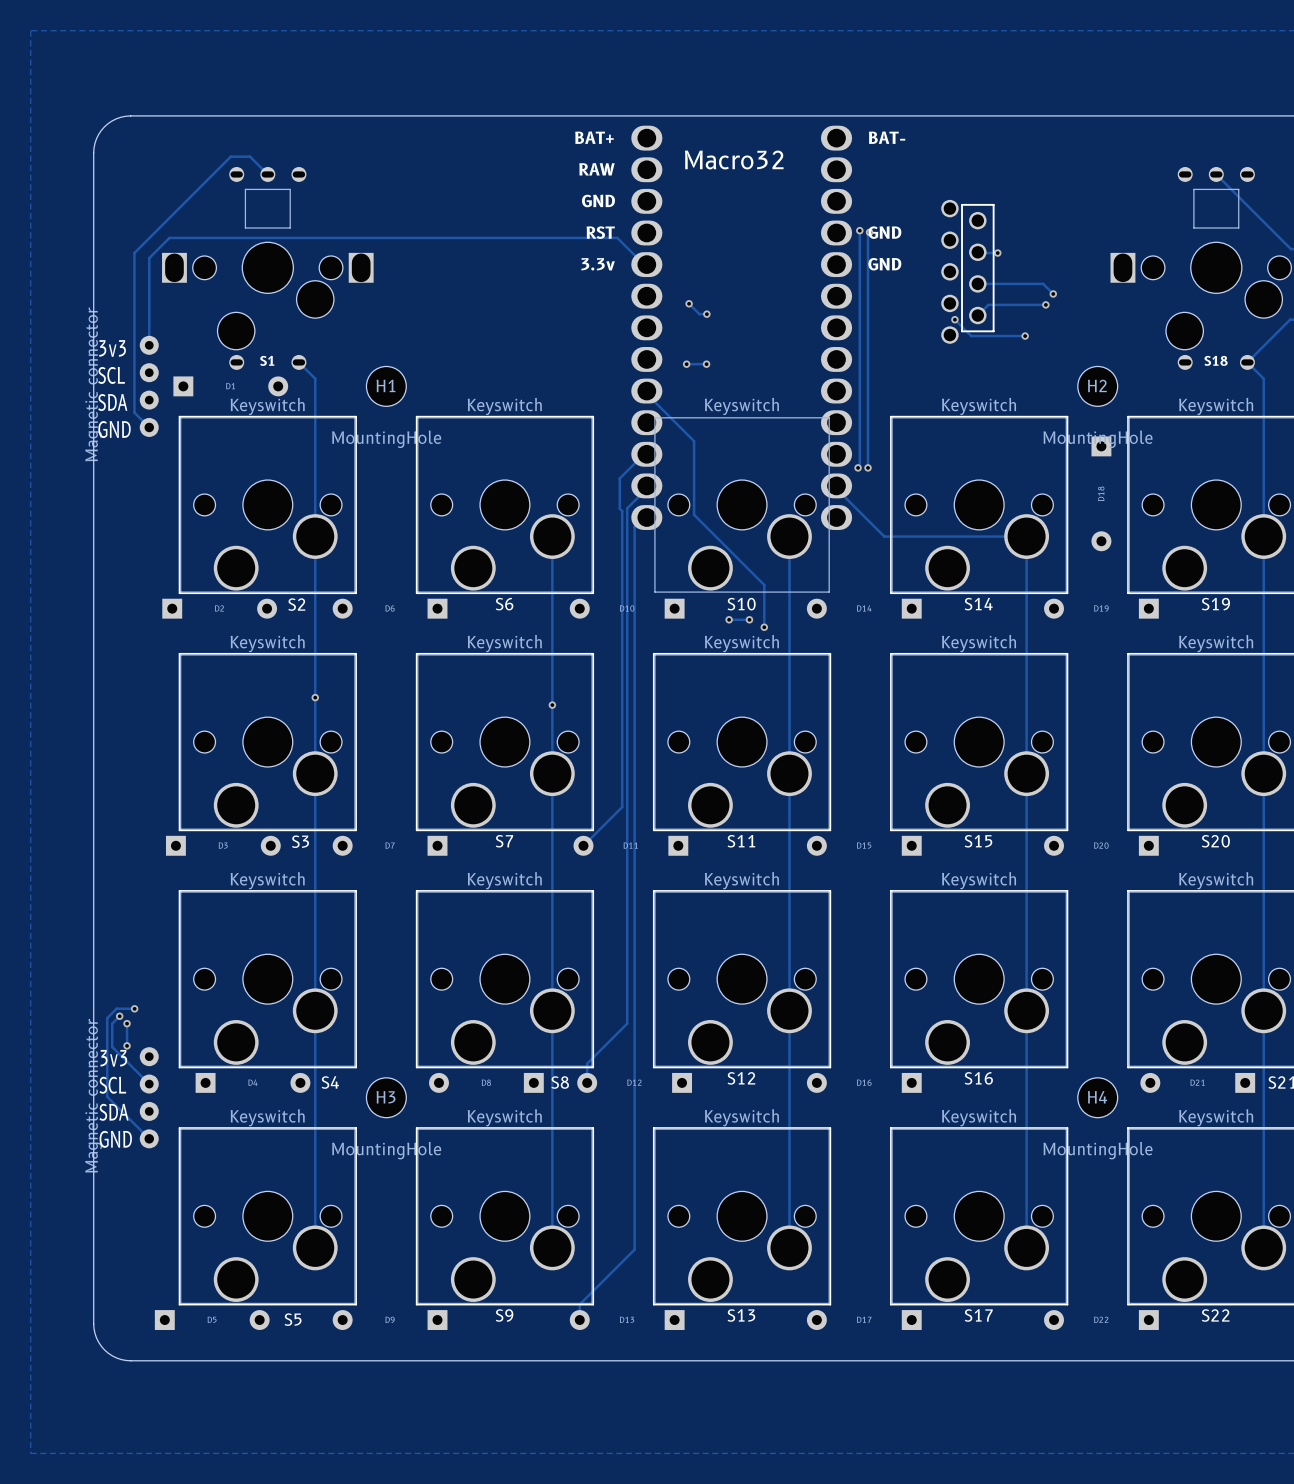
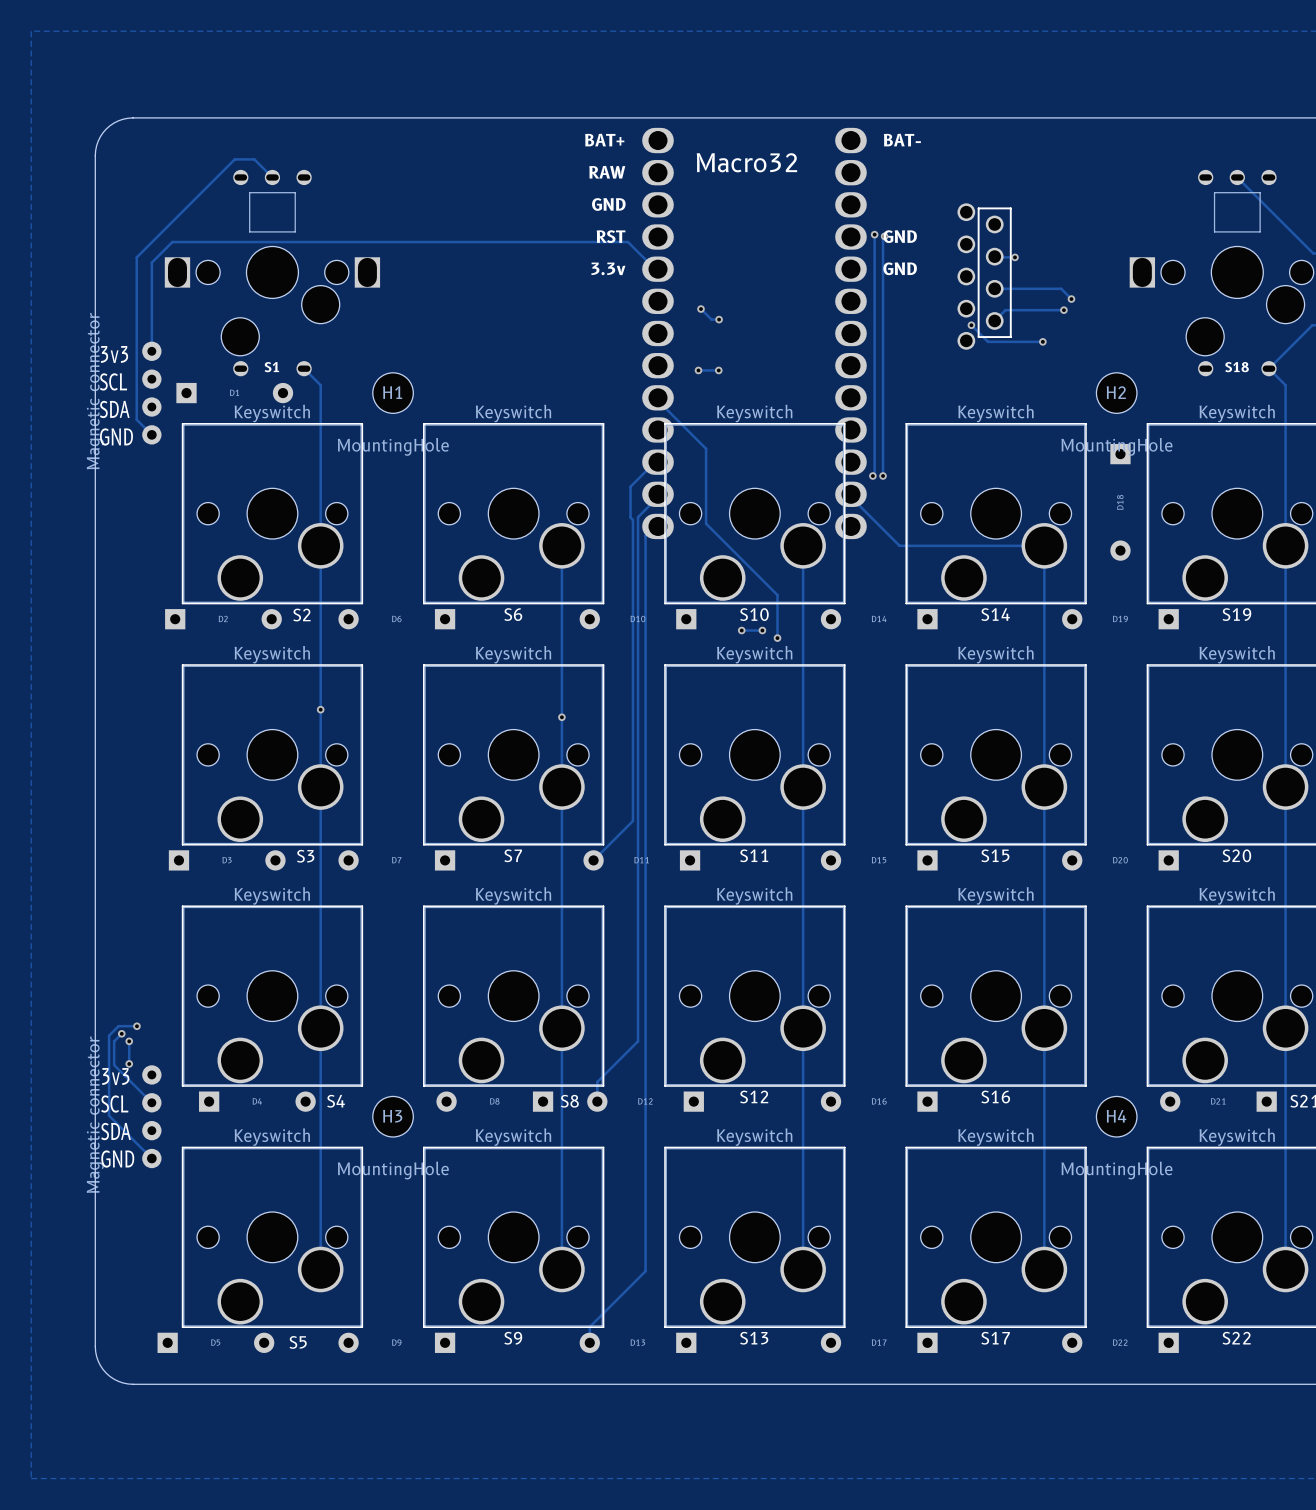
S10 footprint: [654, 417, 830, 593] -> [664, 423, 846, 605]

